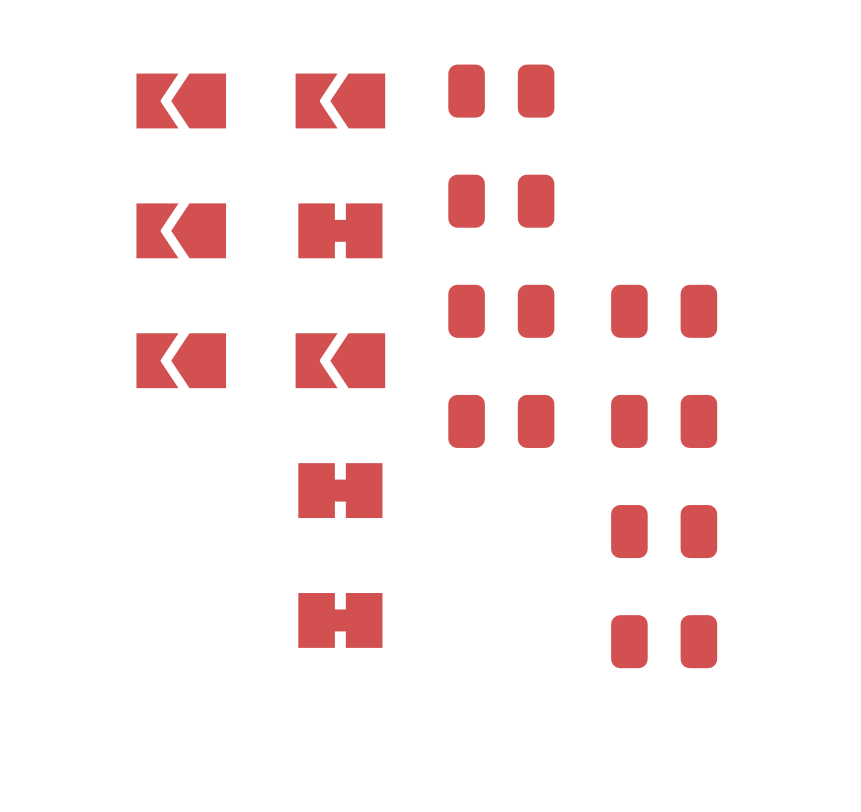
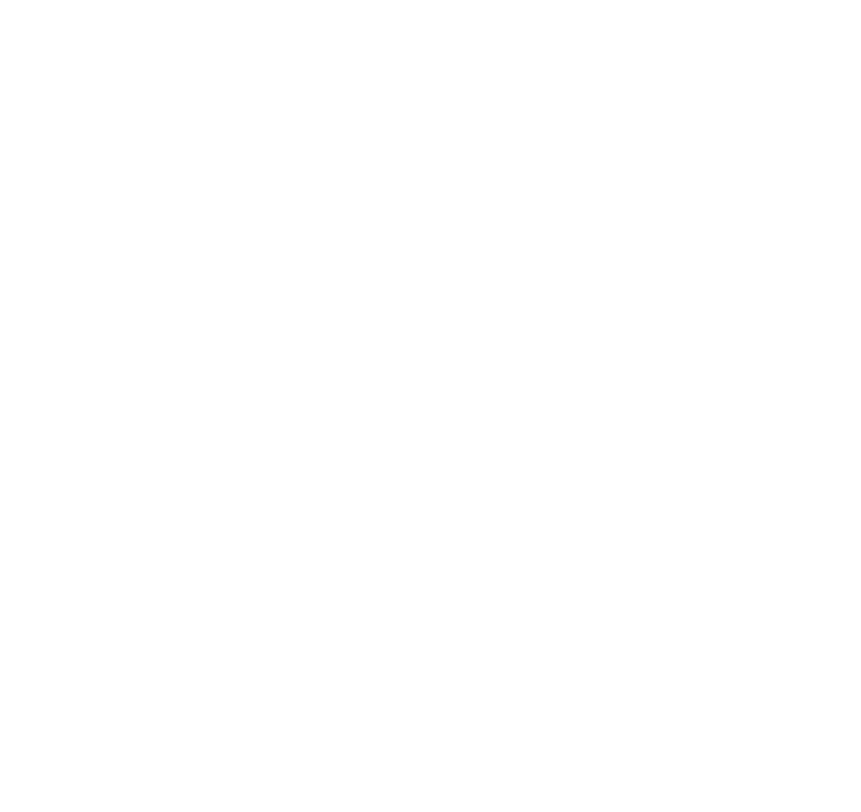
part: (501, 91) -> none
part: (181, 100) -> none
part: (340, 100) -> none
part: (501, 201) -> none
part: (181, 230) -> none
part: (340, 230) -> none
part: (501, 311) -> none
part: (664, 311) -> none
part: (181, 360) -> none
part: (340, 360) -> none
part: (501, 421) -> none
part: (664, 421) -> none
part: (340, 490) -> none
part: (664, 531) -> none
part: (340, 620) -> none
part: (664, 641) -> none

